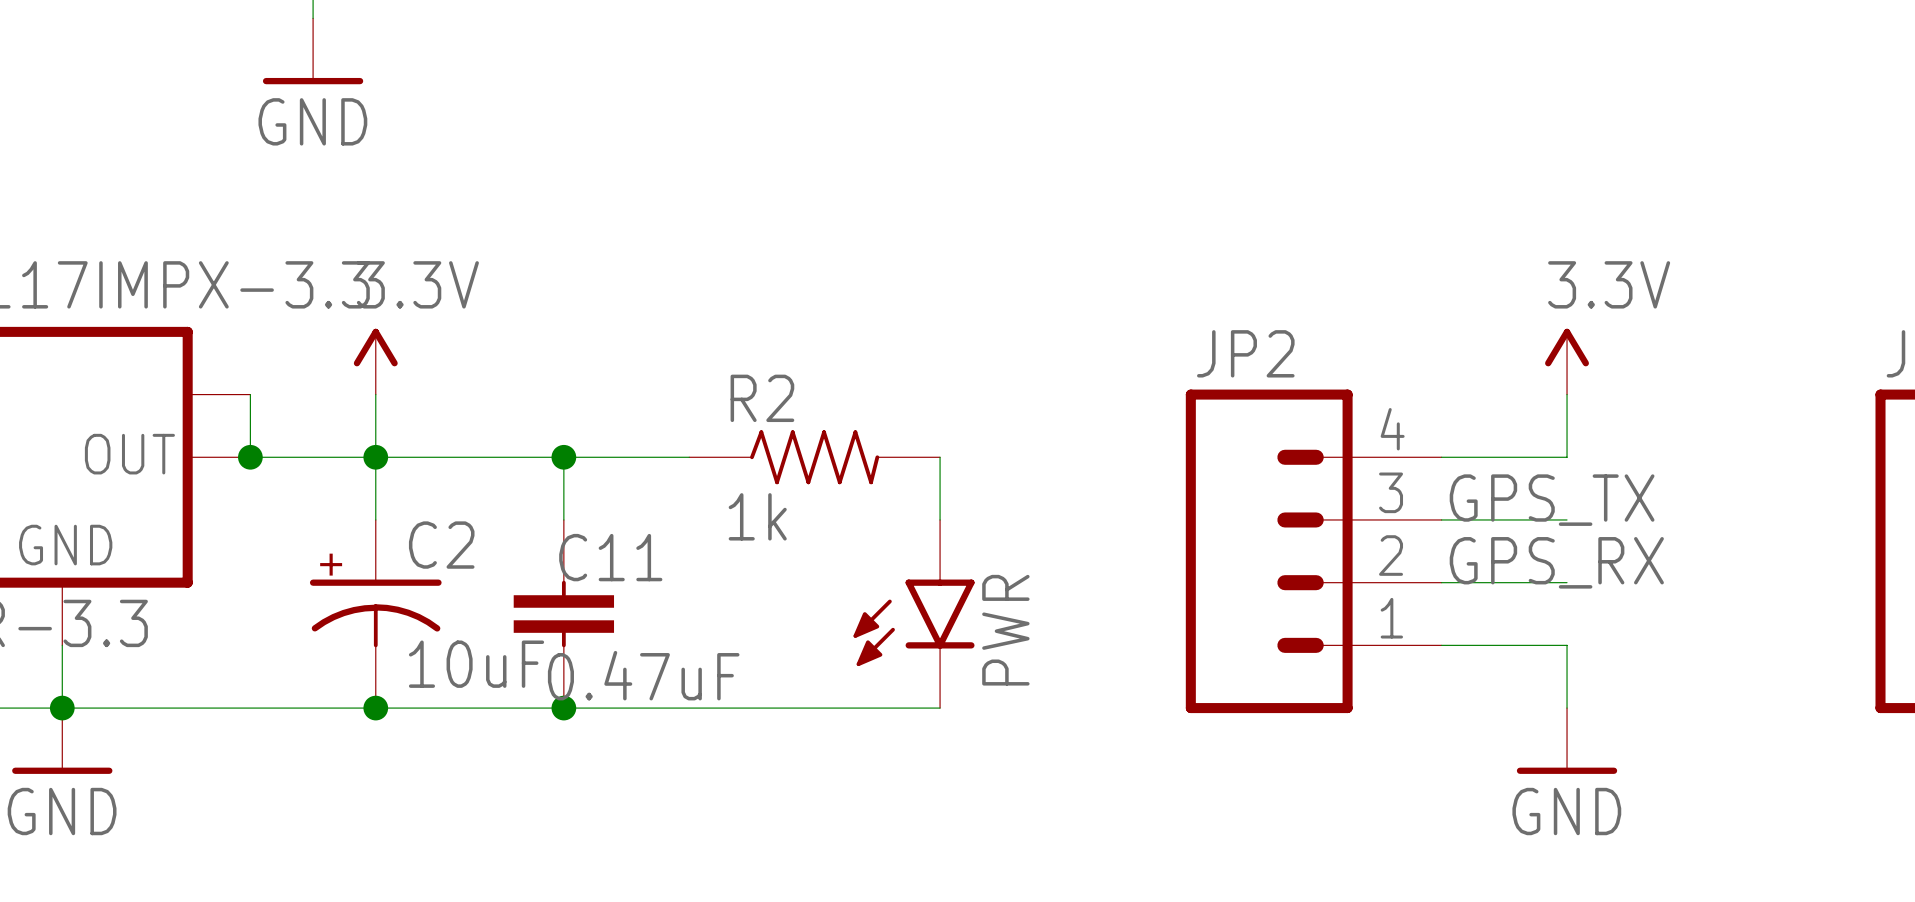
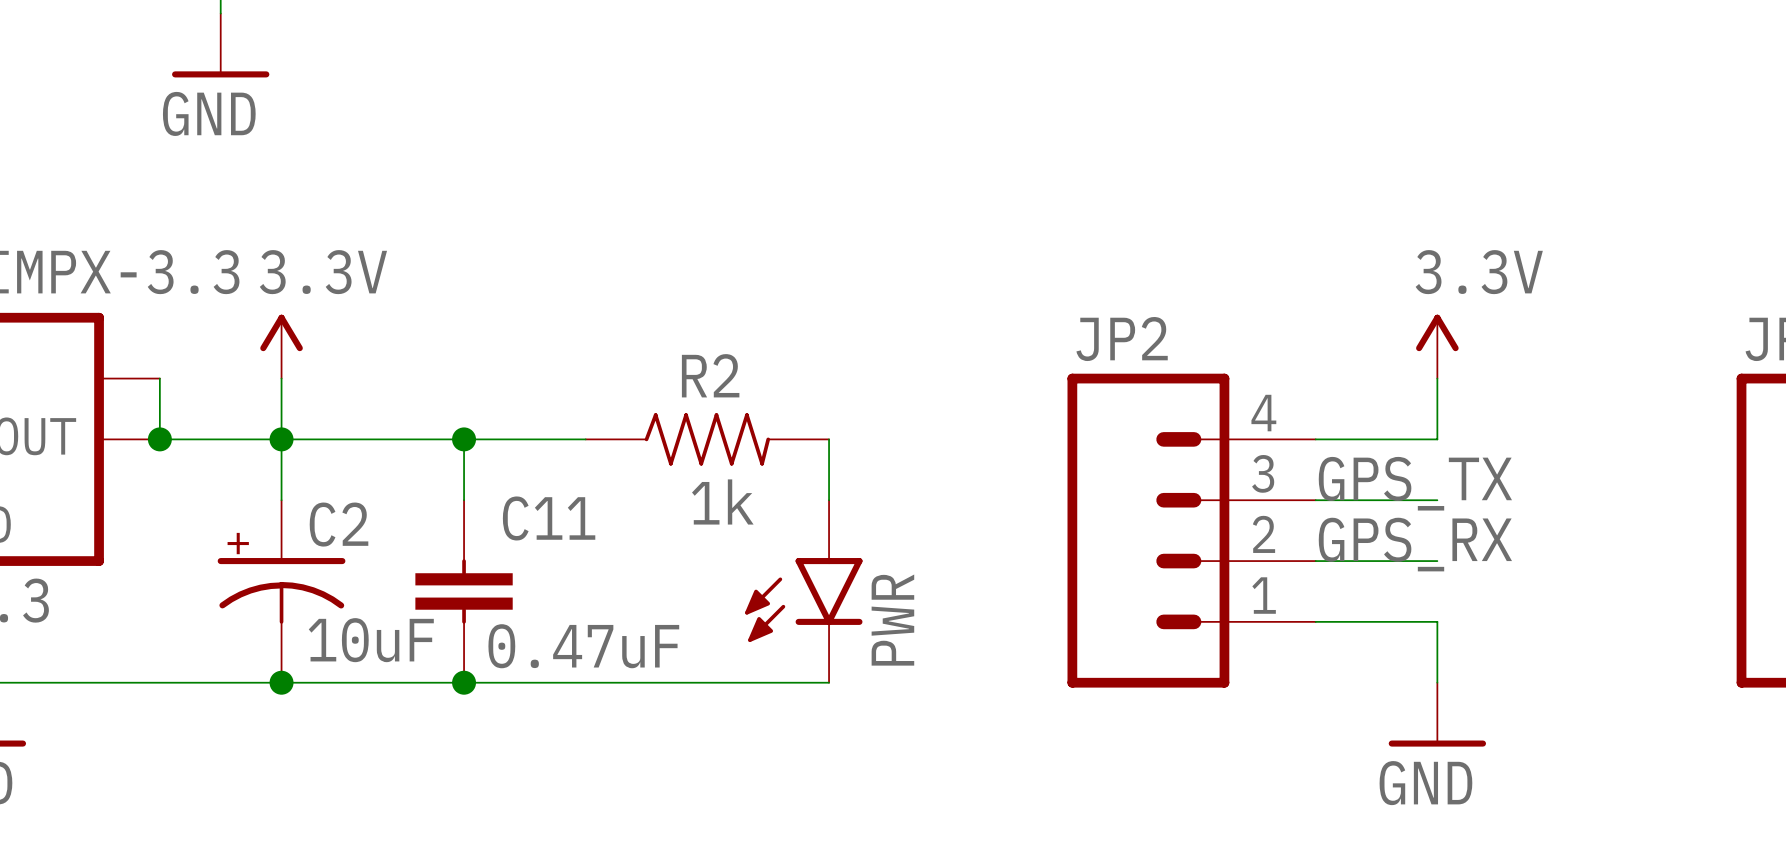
R2 name position: R2 (762, 398) -> R2 (710, 375)
R2 value position: 1k (757, 516) -> 1k (722, 501)
C11 name position: C11 (610, 557) -> C11 (549, 518)
C11 value position: 0.47uF (643, 675) -> 0.47uF (583, 646)

